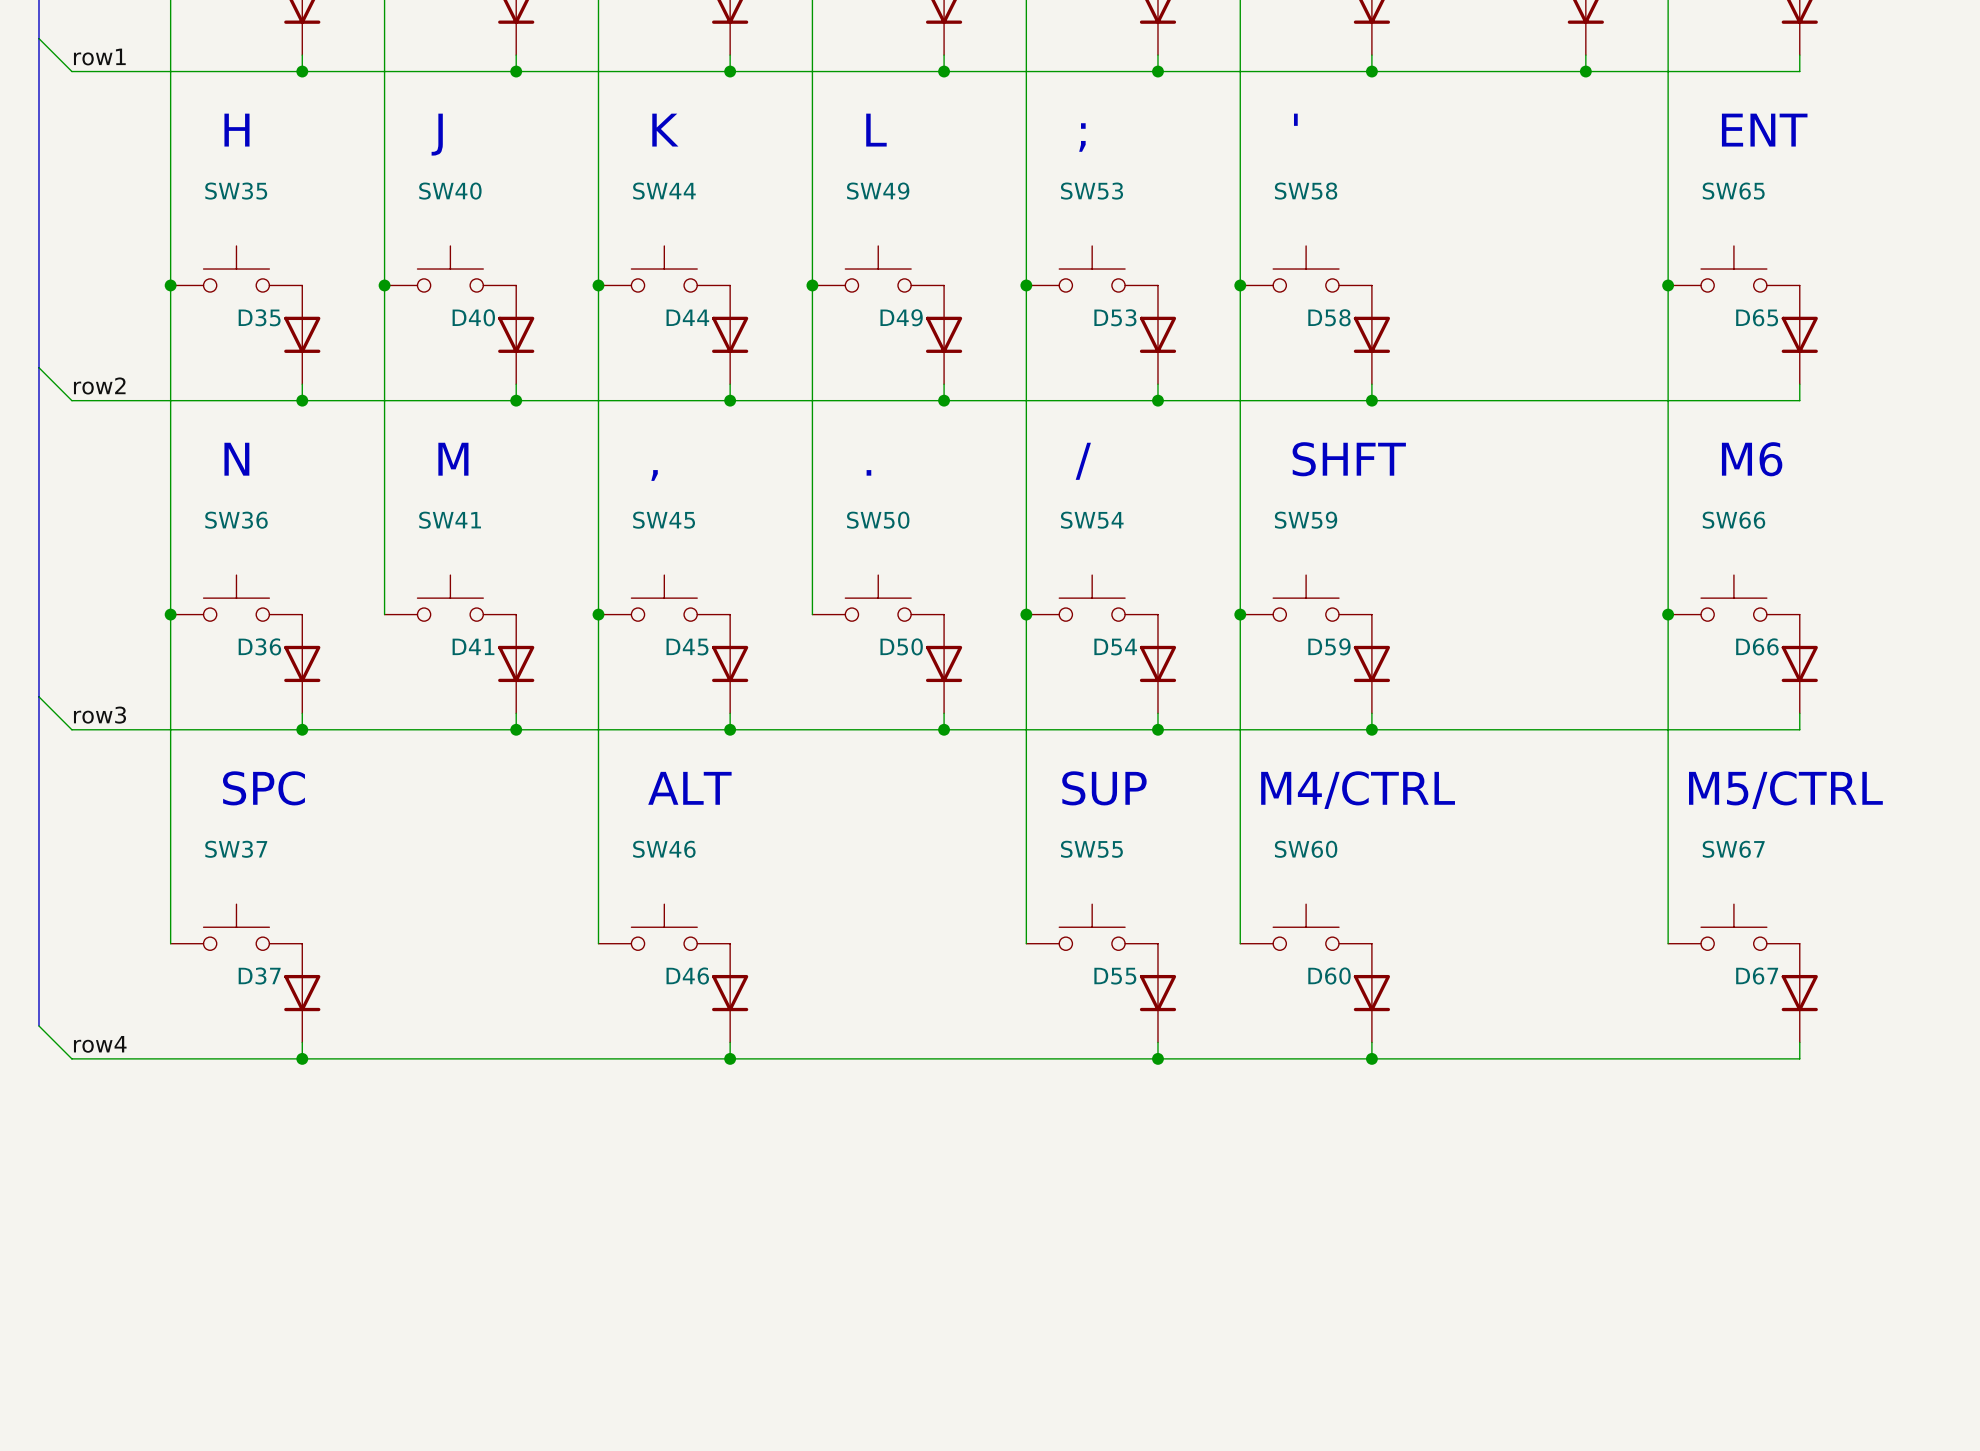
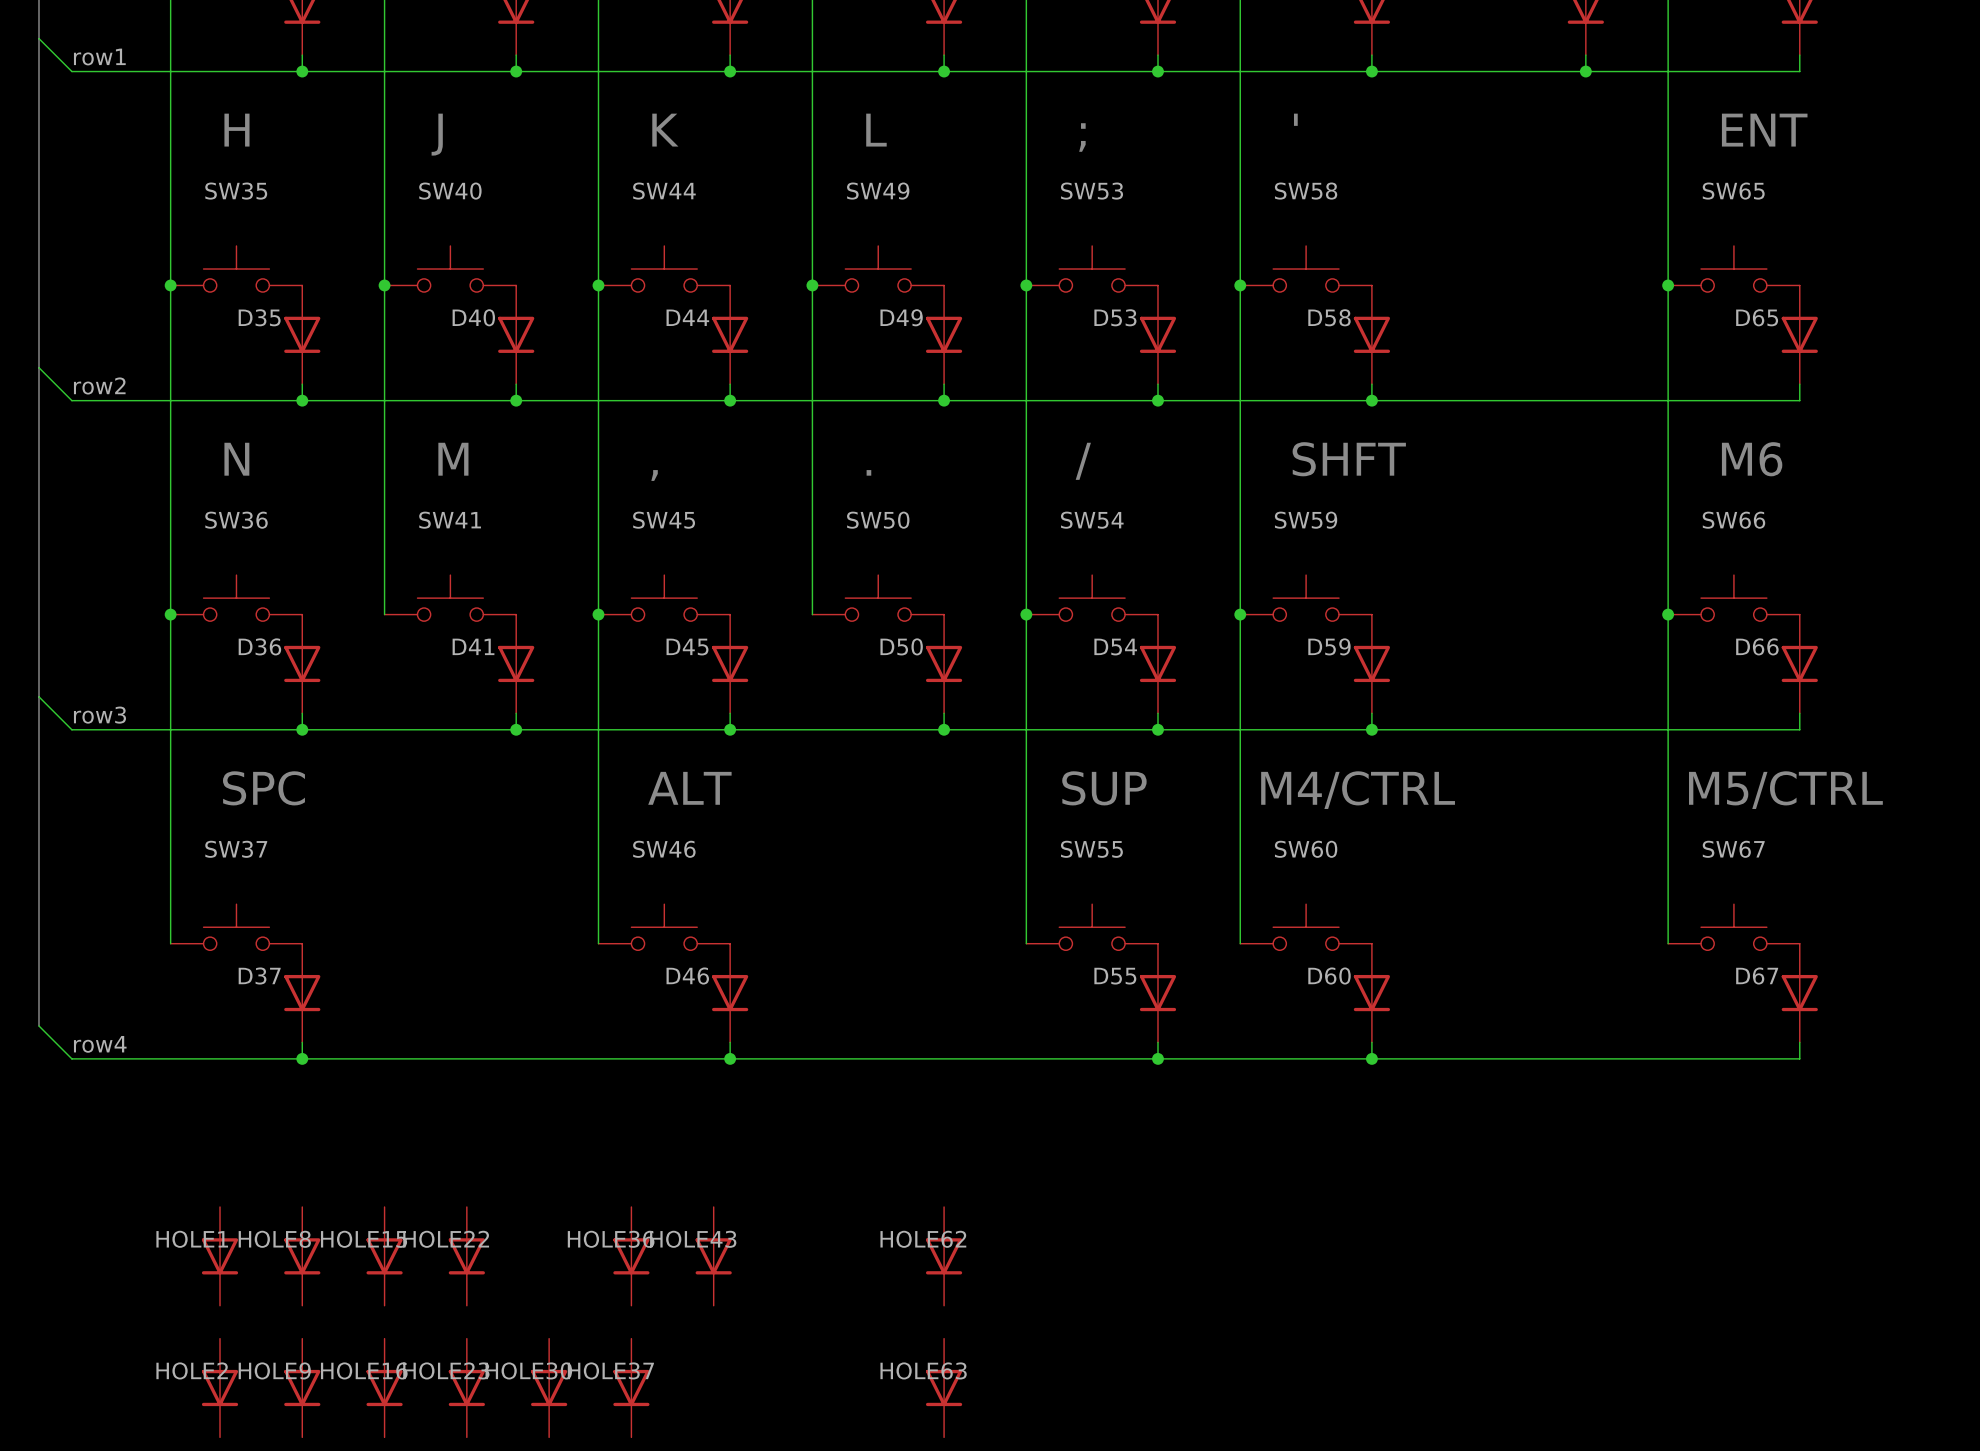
HOLE1: none -> (220, 1256)
HOLE8: none -> (302, 1256)
HOLE15: none -> (384, 1256)
HOLE22: none -> (466, 1256)
HOLE36: none -> (631, 1256)
HOLE43: none -> (713, 1256)
HOLE62: none -> (944, 1256)
HOLE2: none -> (220, 1388)
HOLE9: none -> (302, 1388)
HOLE16: none -> (384, 1388)
HOLE23: none -> (466, 1388)
HOLE30: none -> (549, 1388)
HOLE37: none -> (631, 1388)
HOLE63: none -> (944, 1388)

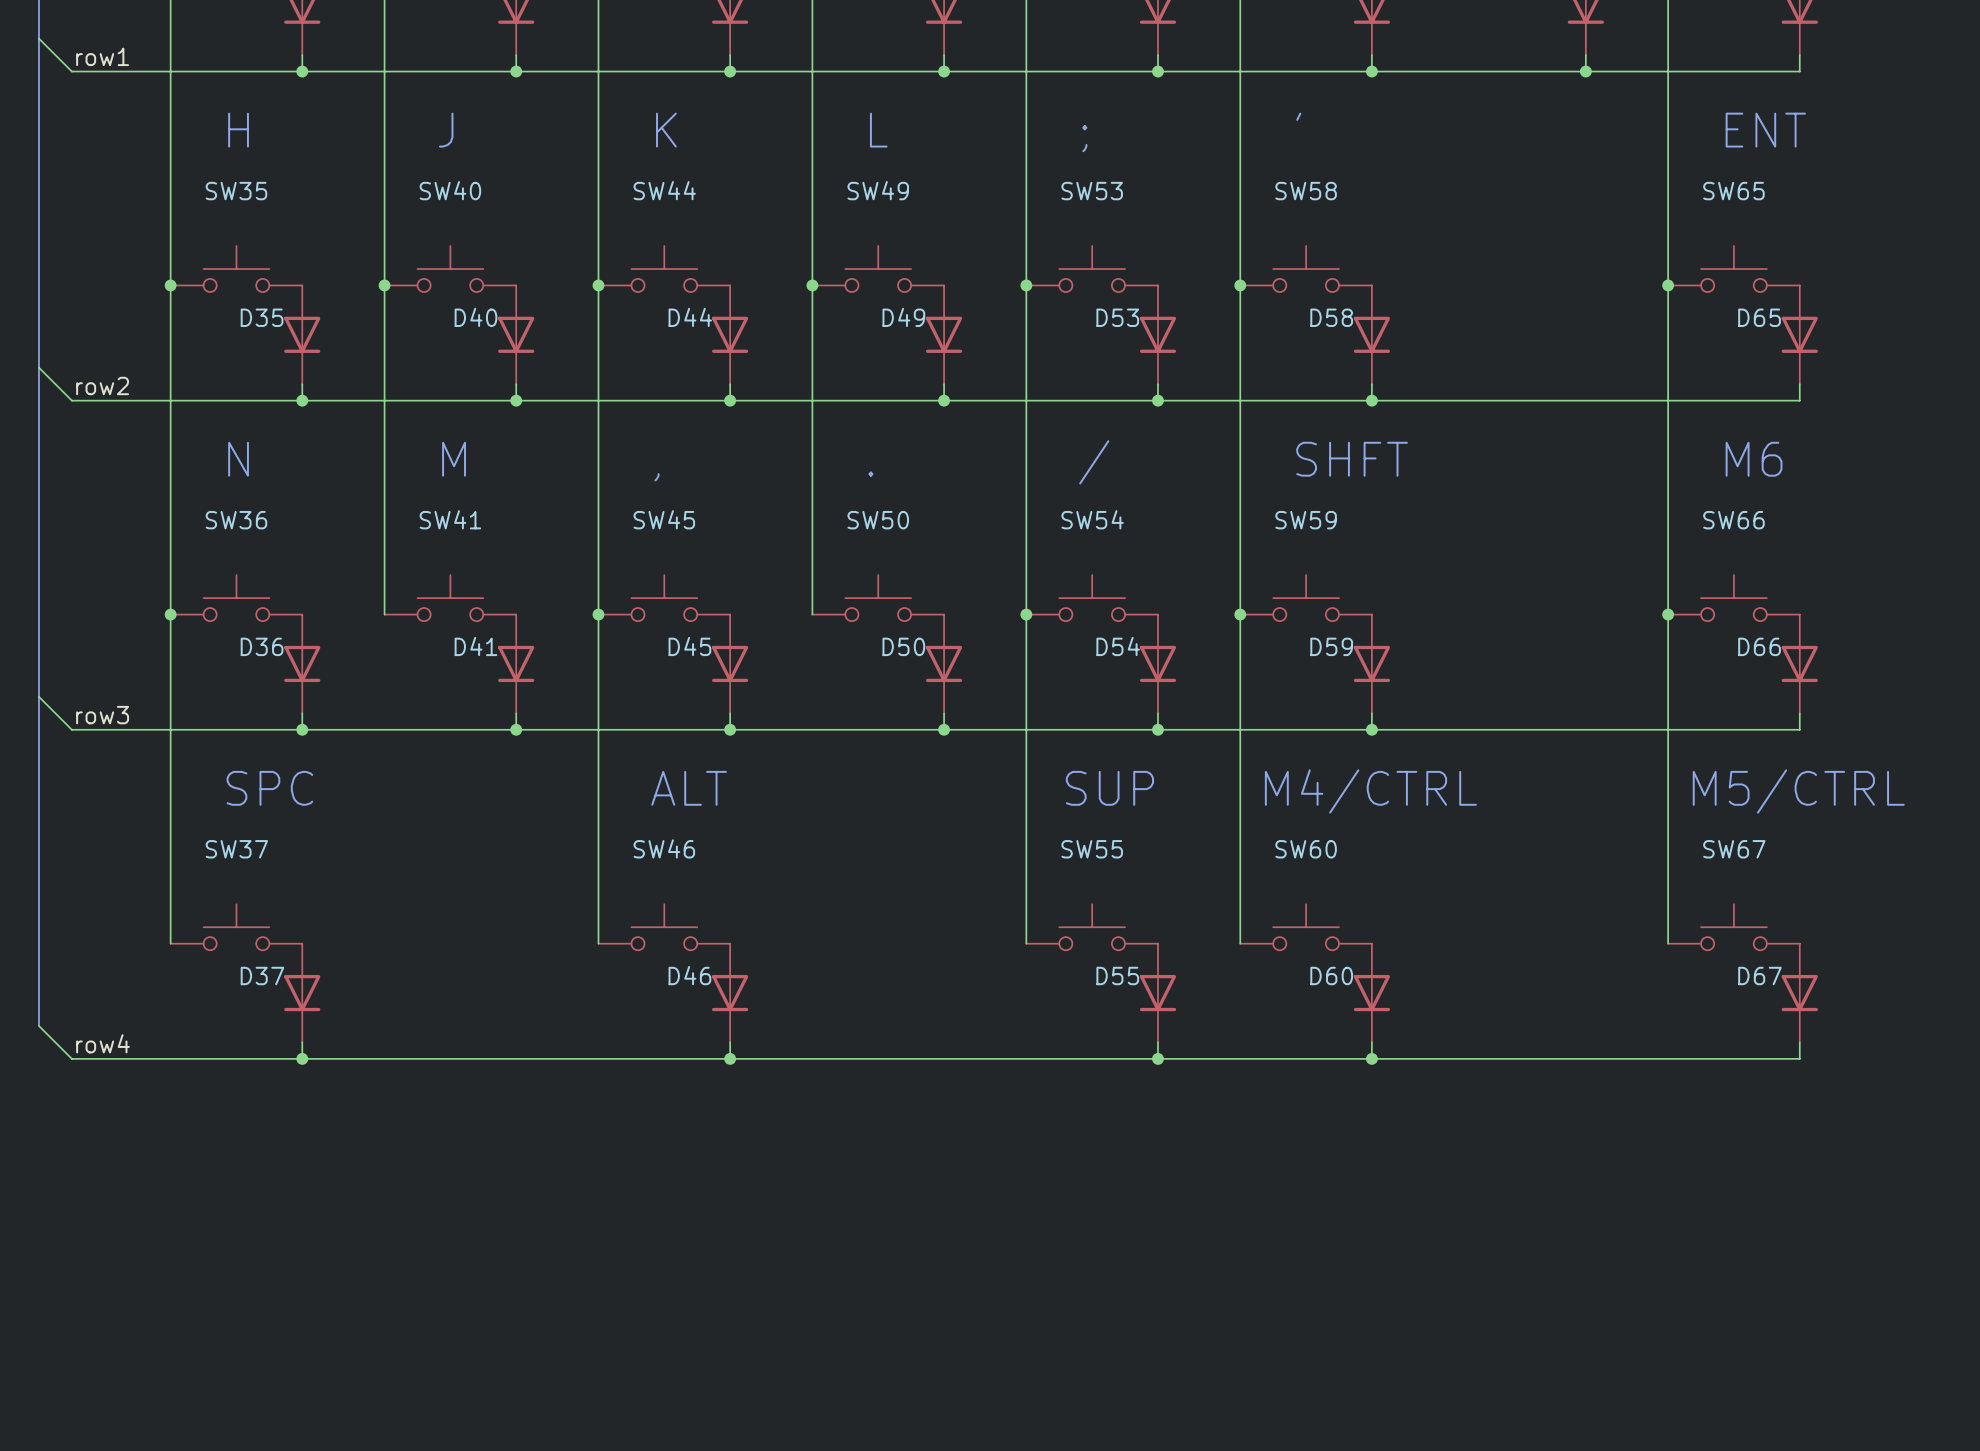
HOLE1: (220, 1256) -> none
HOLE8: (302, 1256) -> none
HOLE15: (384, 1256) -> none
HOLE22: (466, 1256) -> none
HOLE36: (631, 1256) -> none
HOLE43: (713, 1256) -> none
HOLE62: (944, 1256) -> none
HOLE2: (220, 1388) -> none
HOLE9: (302, 1388) -> none
HOLE16: (384, 1388) -> none
HOLE23: (466, 1388) -> none
HOLE30: (549, 1388) -> none
HOLE37: (631, 1388) -> none
HOLE63: (944, 1388) -> none

